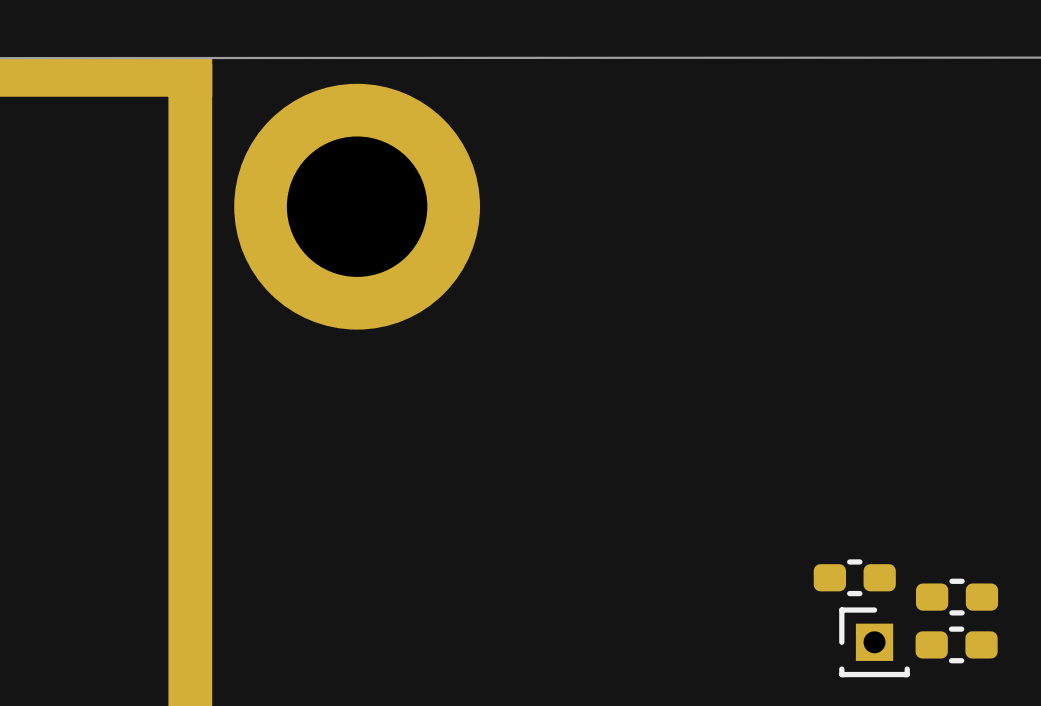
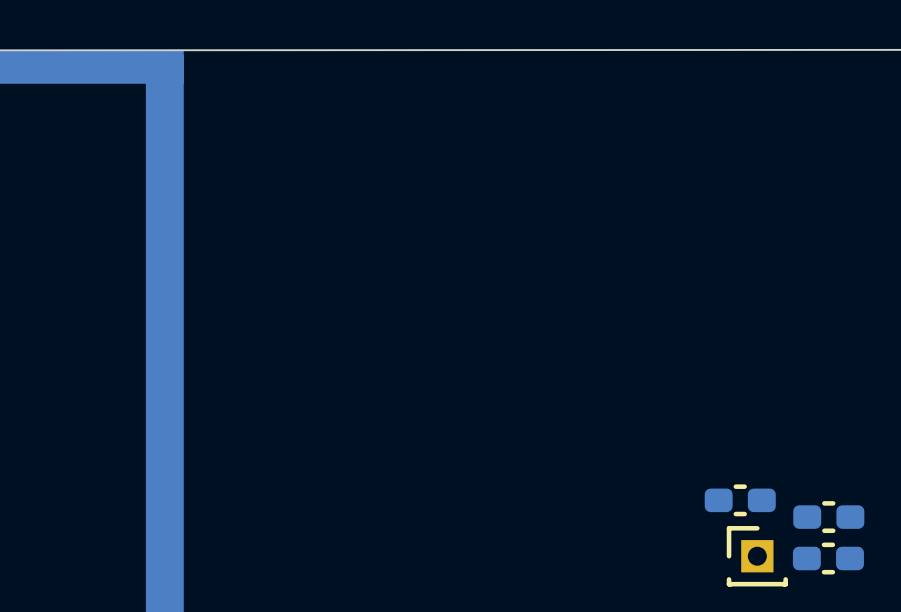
part: (357, 206) -> none

